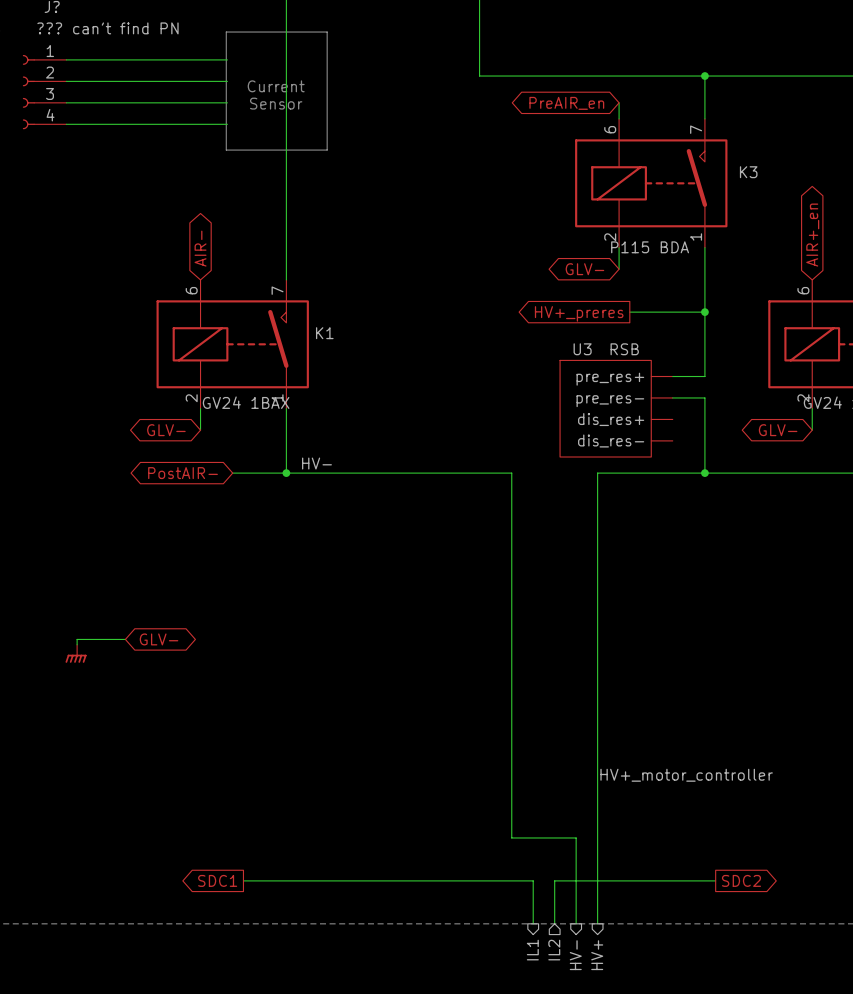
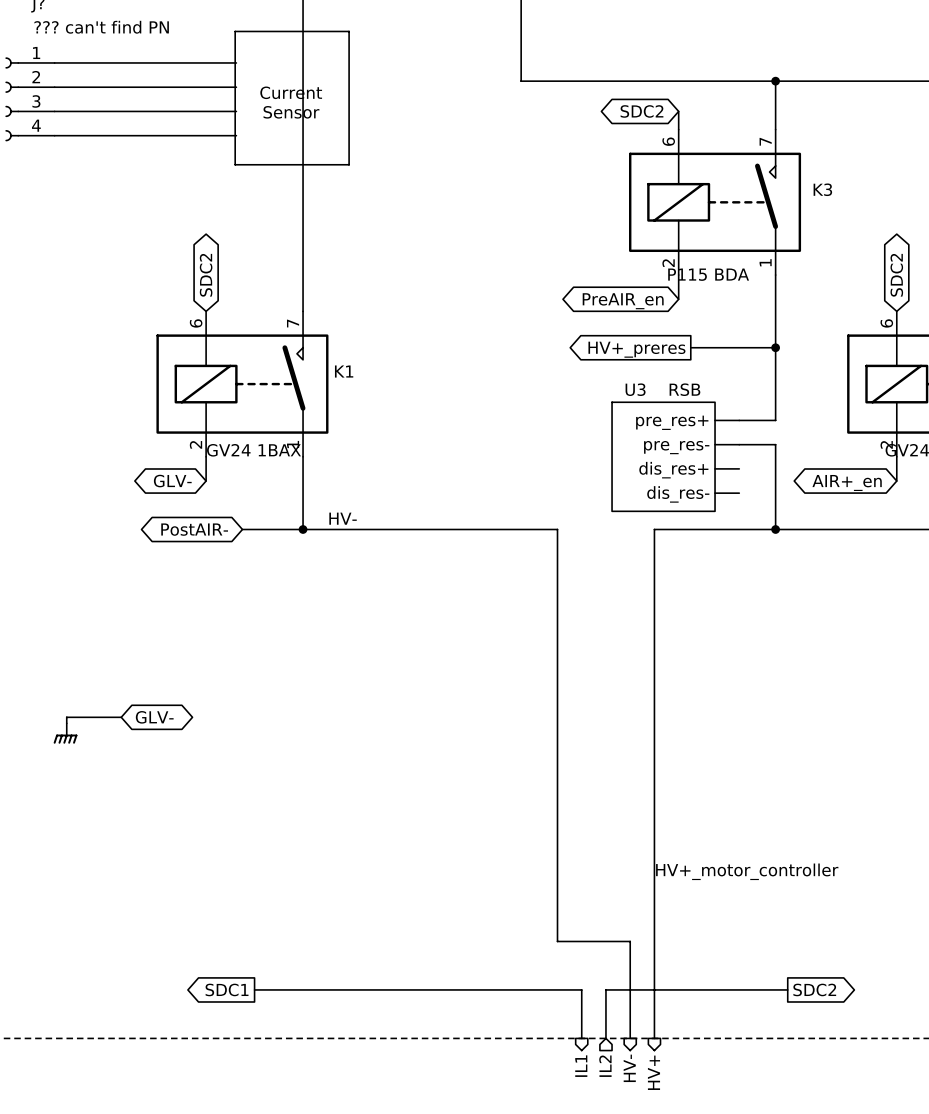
global label: PreAIR_en (566, 103) -> SDC2 (641, 111)
global label: AIR+_en (812, 235) -> SDC2 (896, 275)
global label: AIR- (200, 248) -> SDC2 (206, 275)
global label: GLV- (584, 269) -> PreAIR_en (623, 301)
global label: GLV- (778, 430) -> AIR+_en (847, 482)

